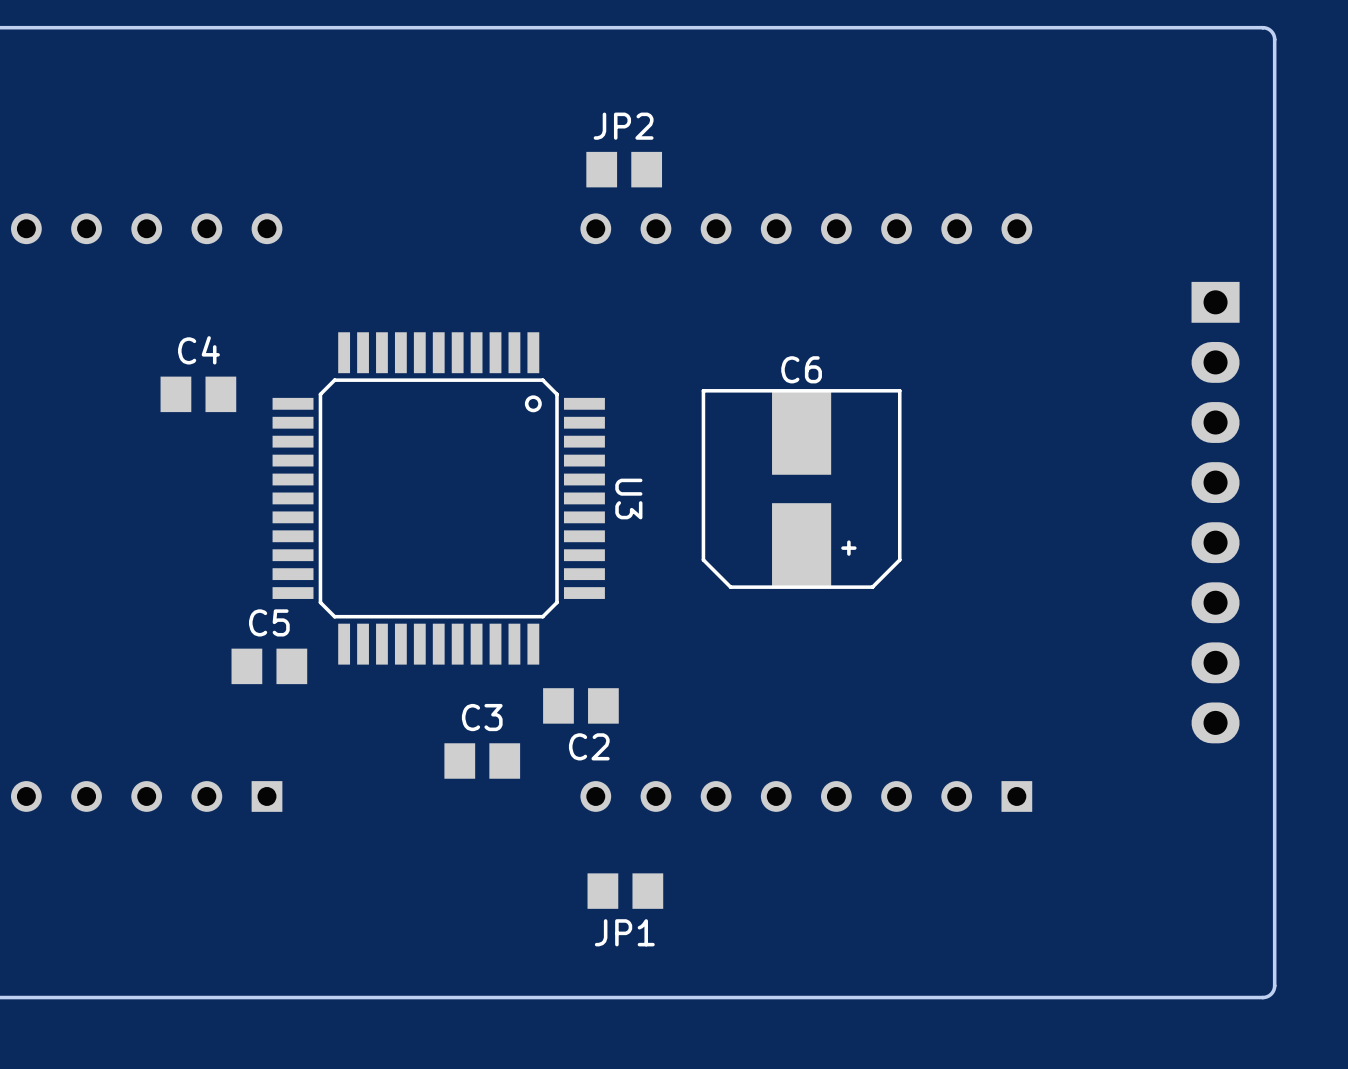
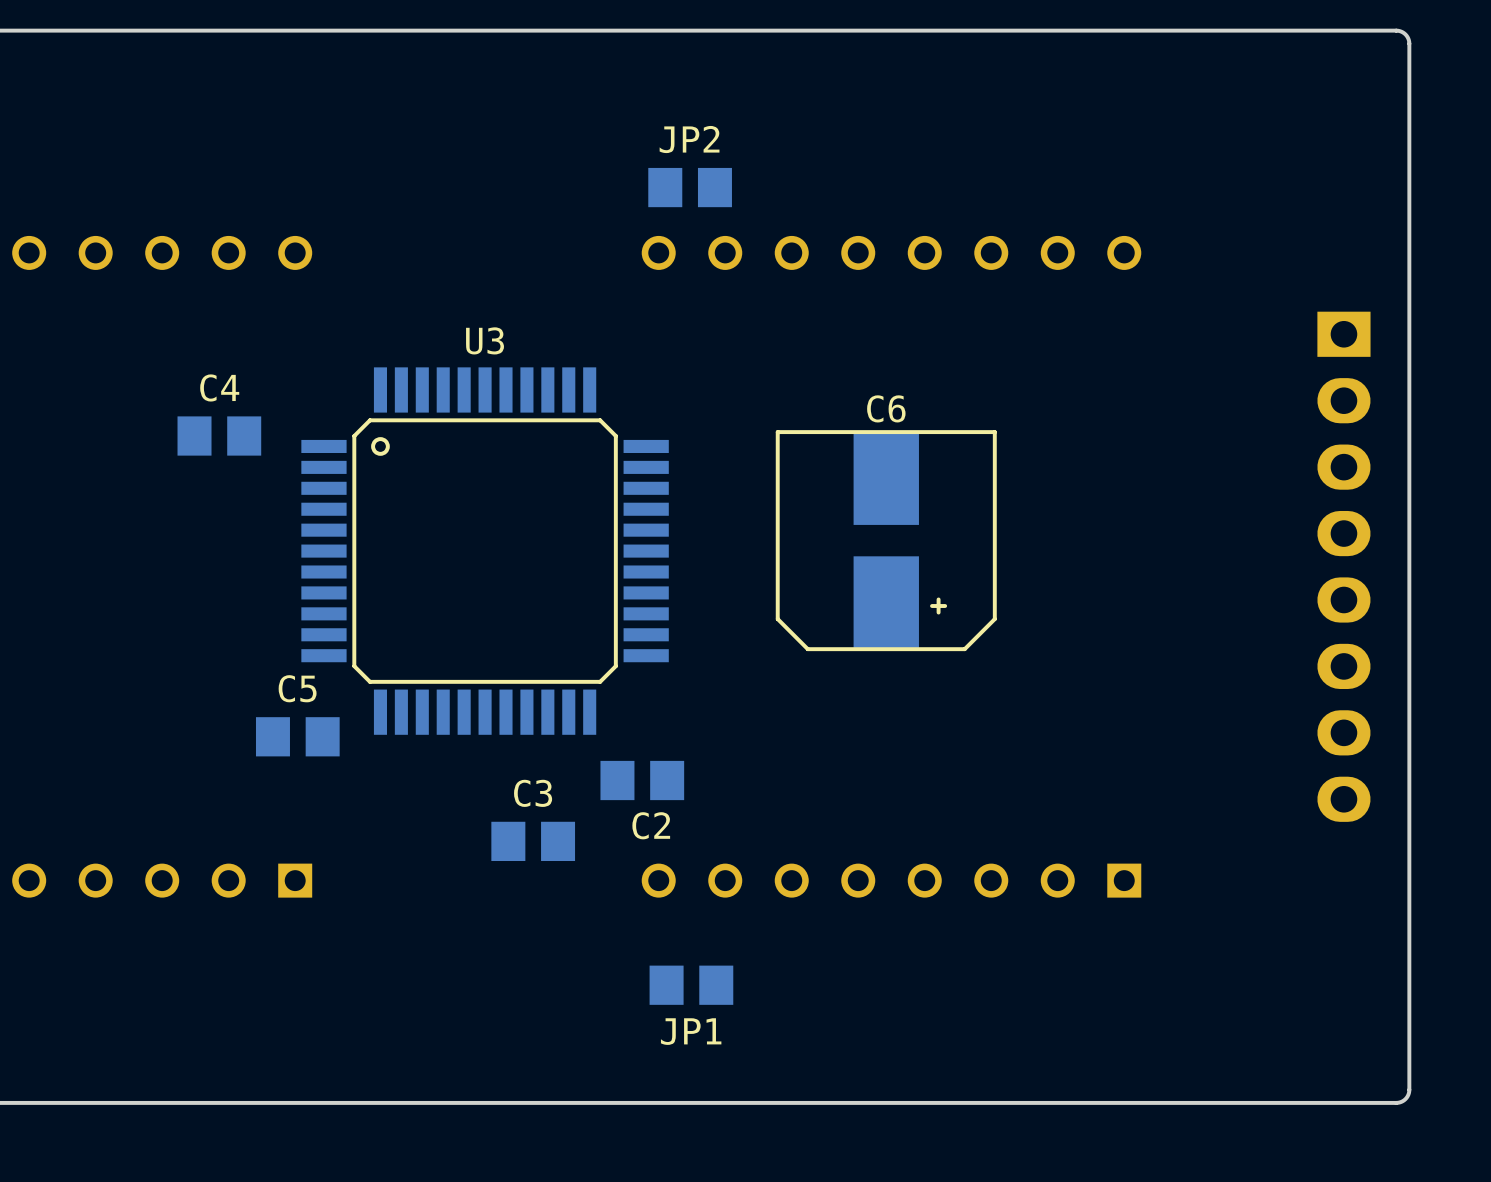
U3 rotation: 0° (438, 498) -> 90° counterclockwise (485, 551)

